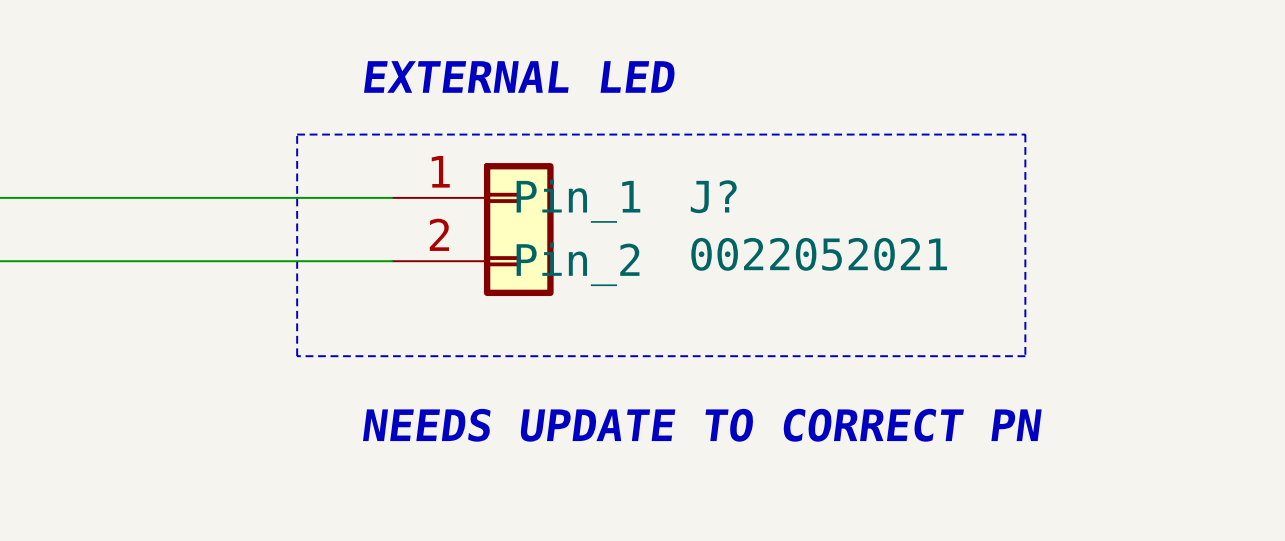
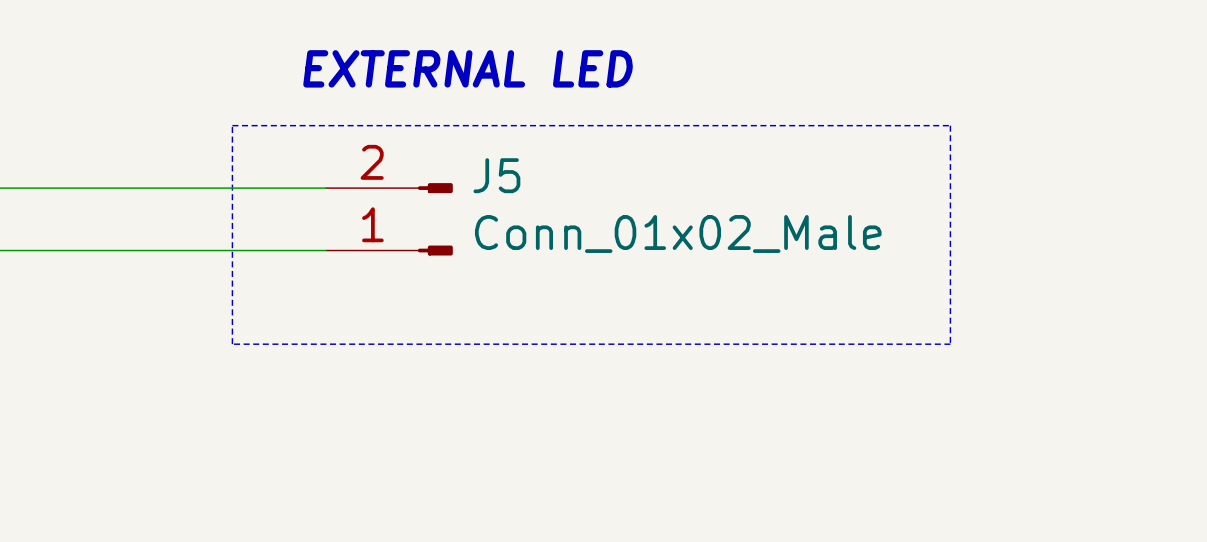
J5: none -> Conn_01x02_Male (389, 219)
J?: 0022052021 (472, 229) -> none
text: NEEDS UPDATE TO CORRECT PN (702, 425) -> none

